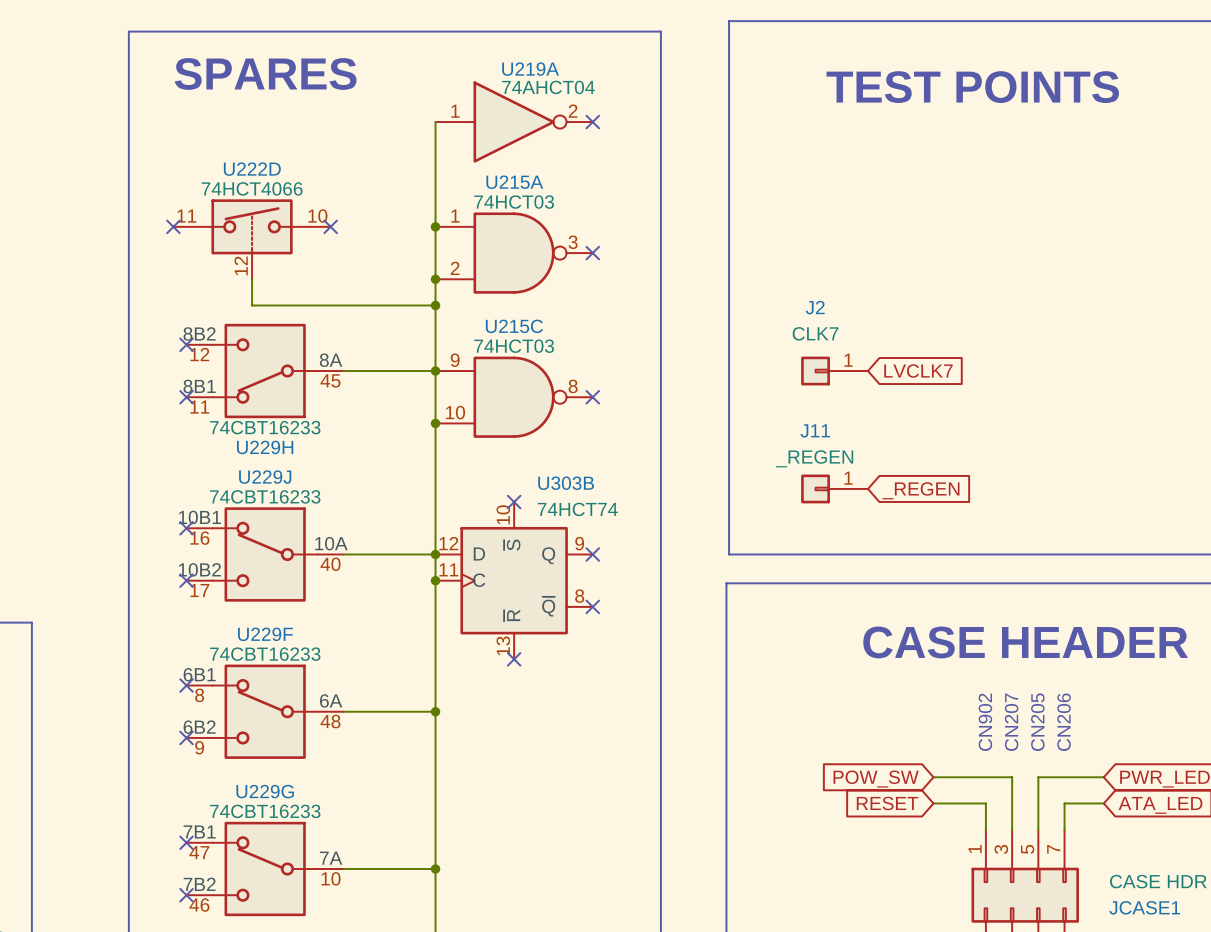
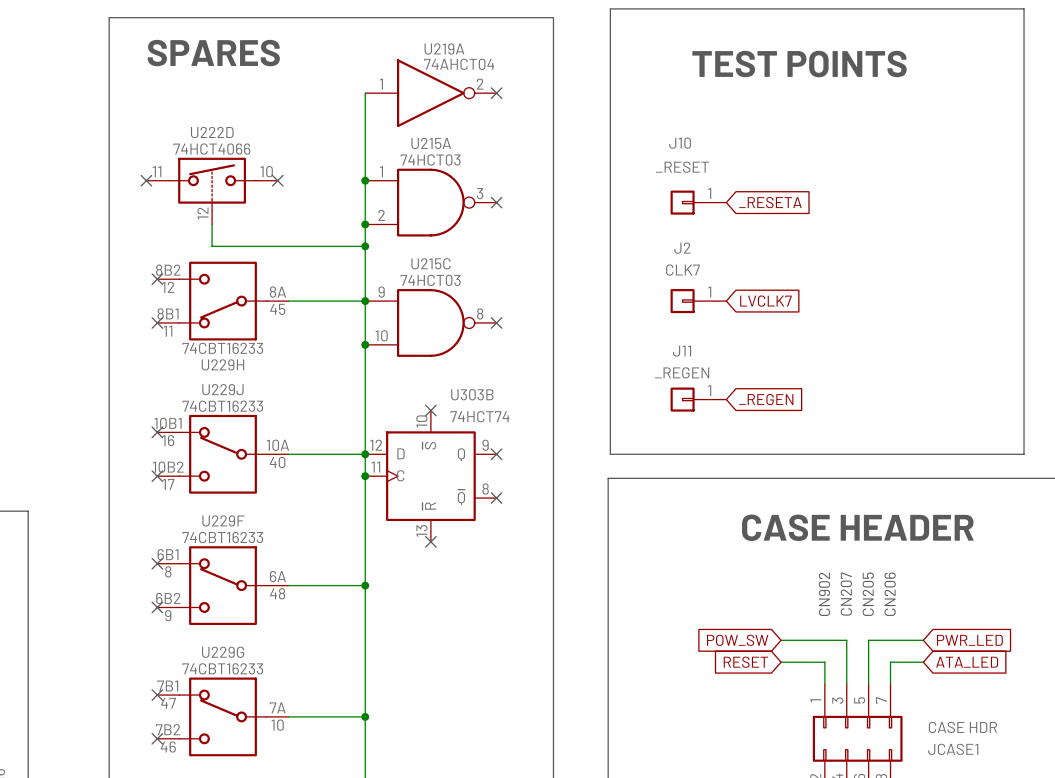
J10: none -> _RESET (698, 202)
global label: none -> _RESETA (770, 202)

